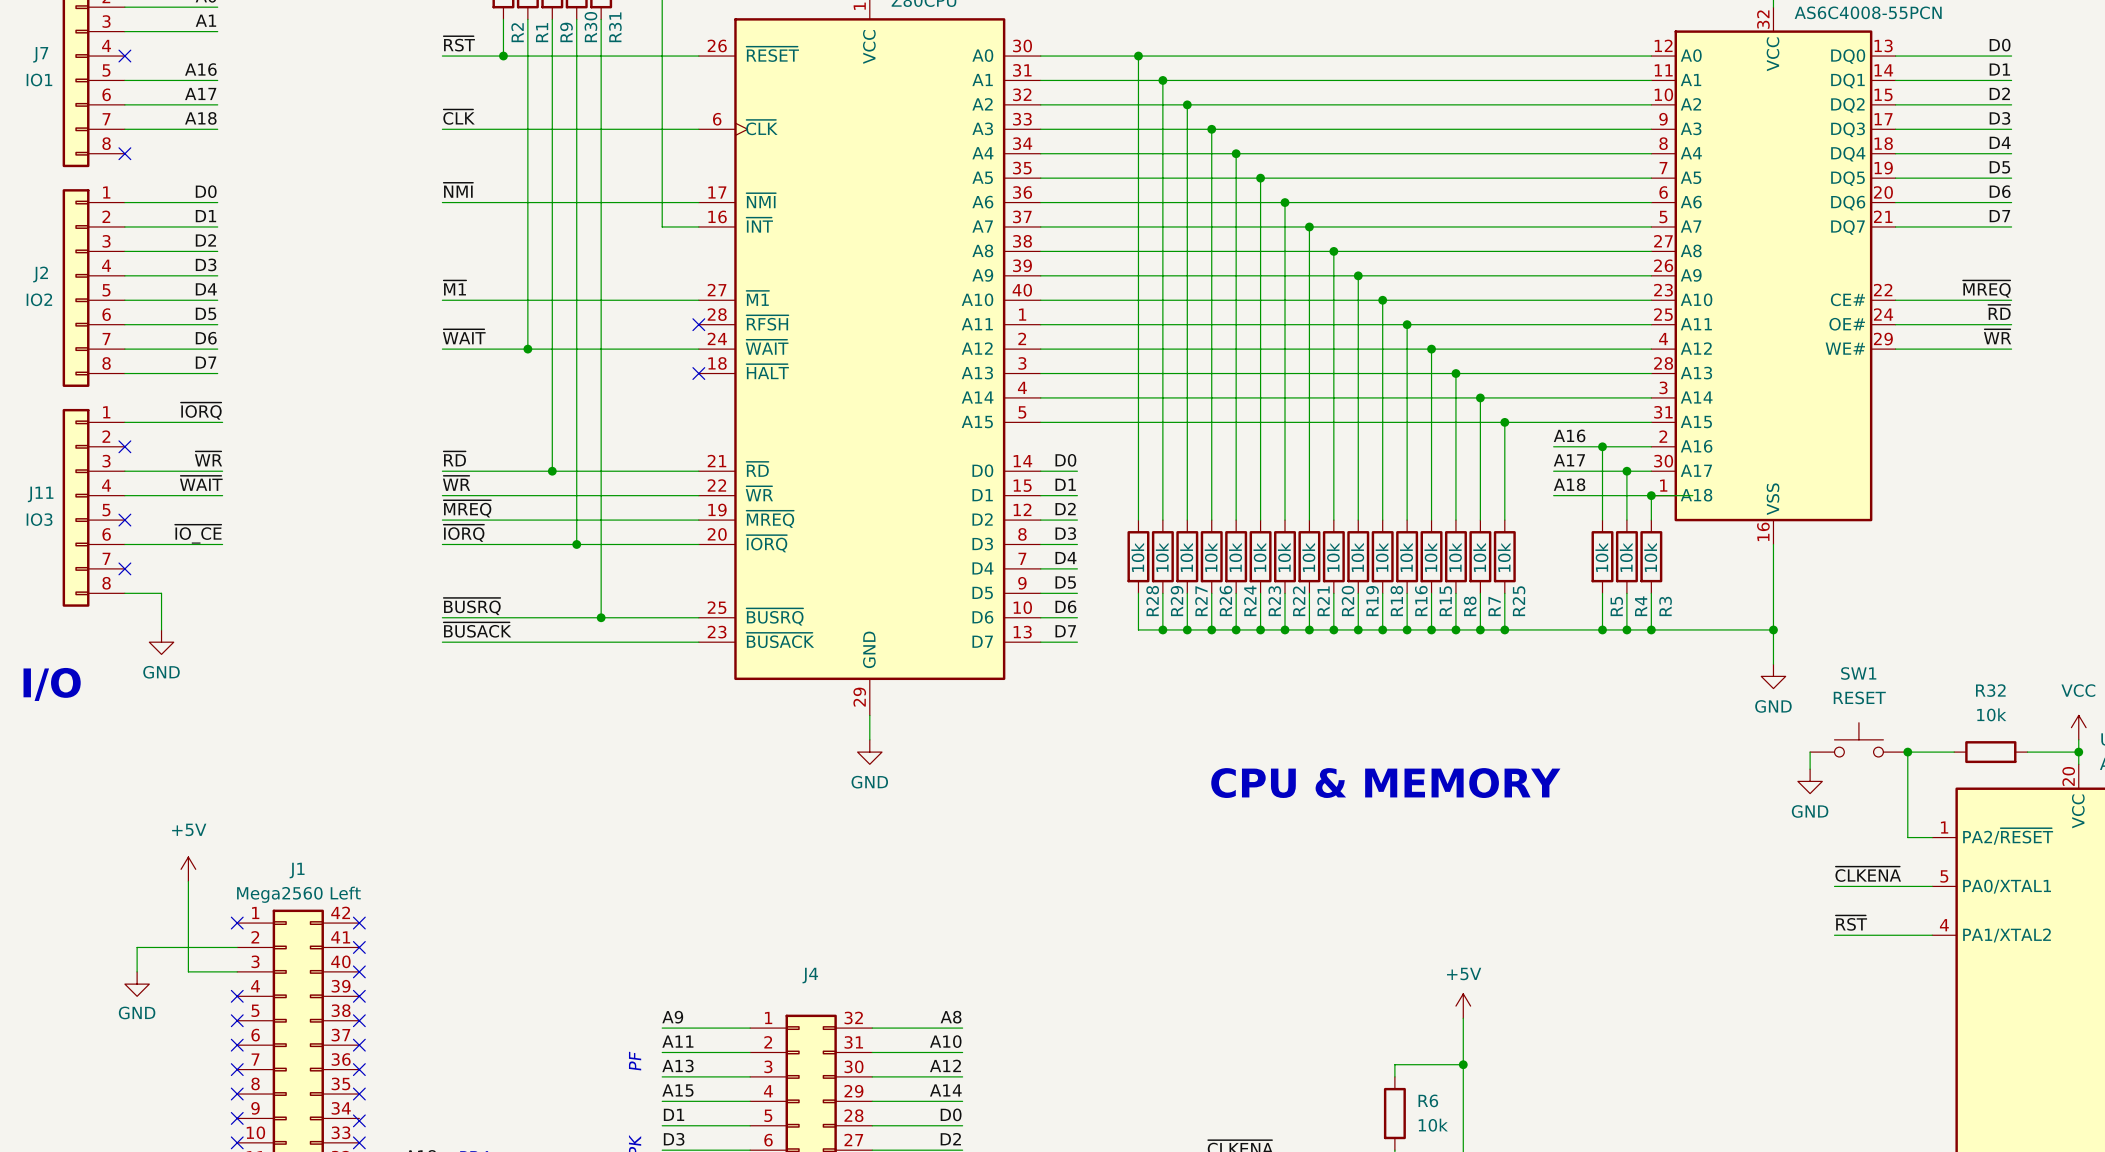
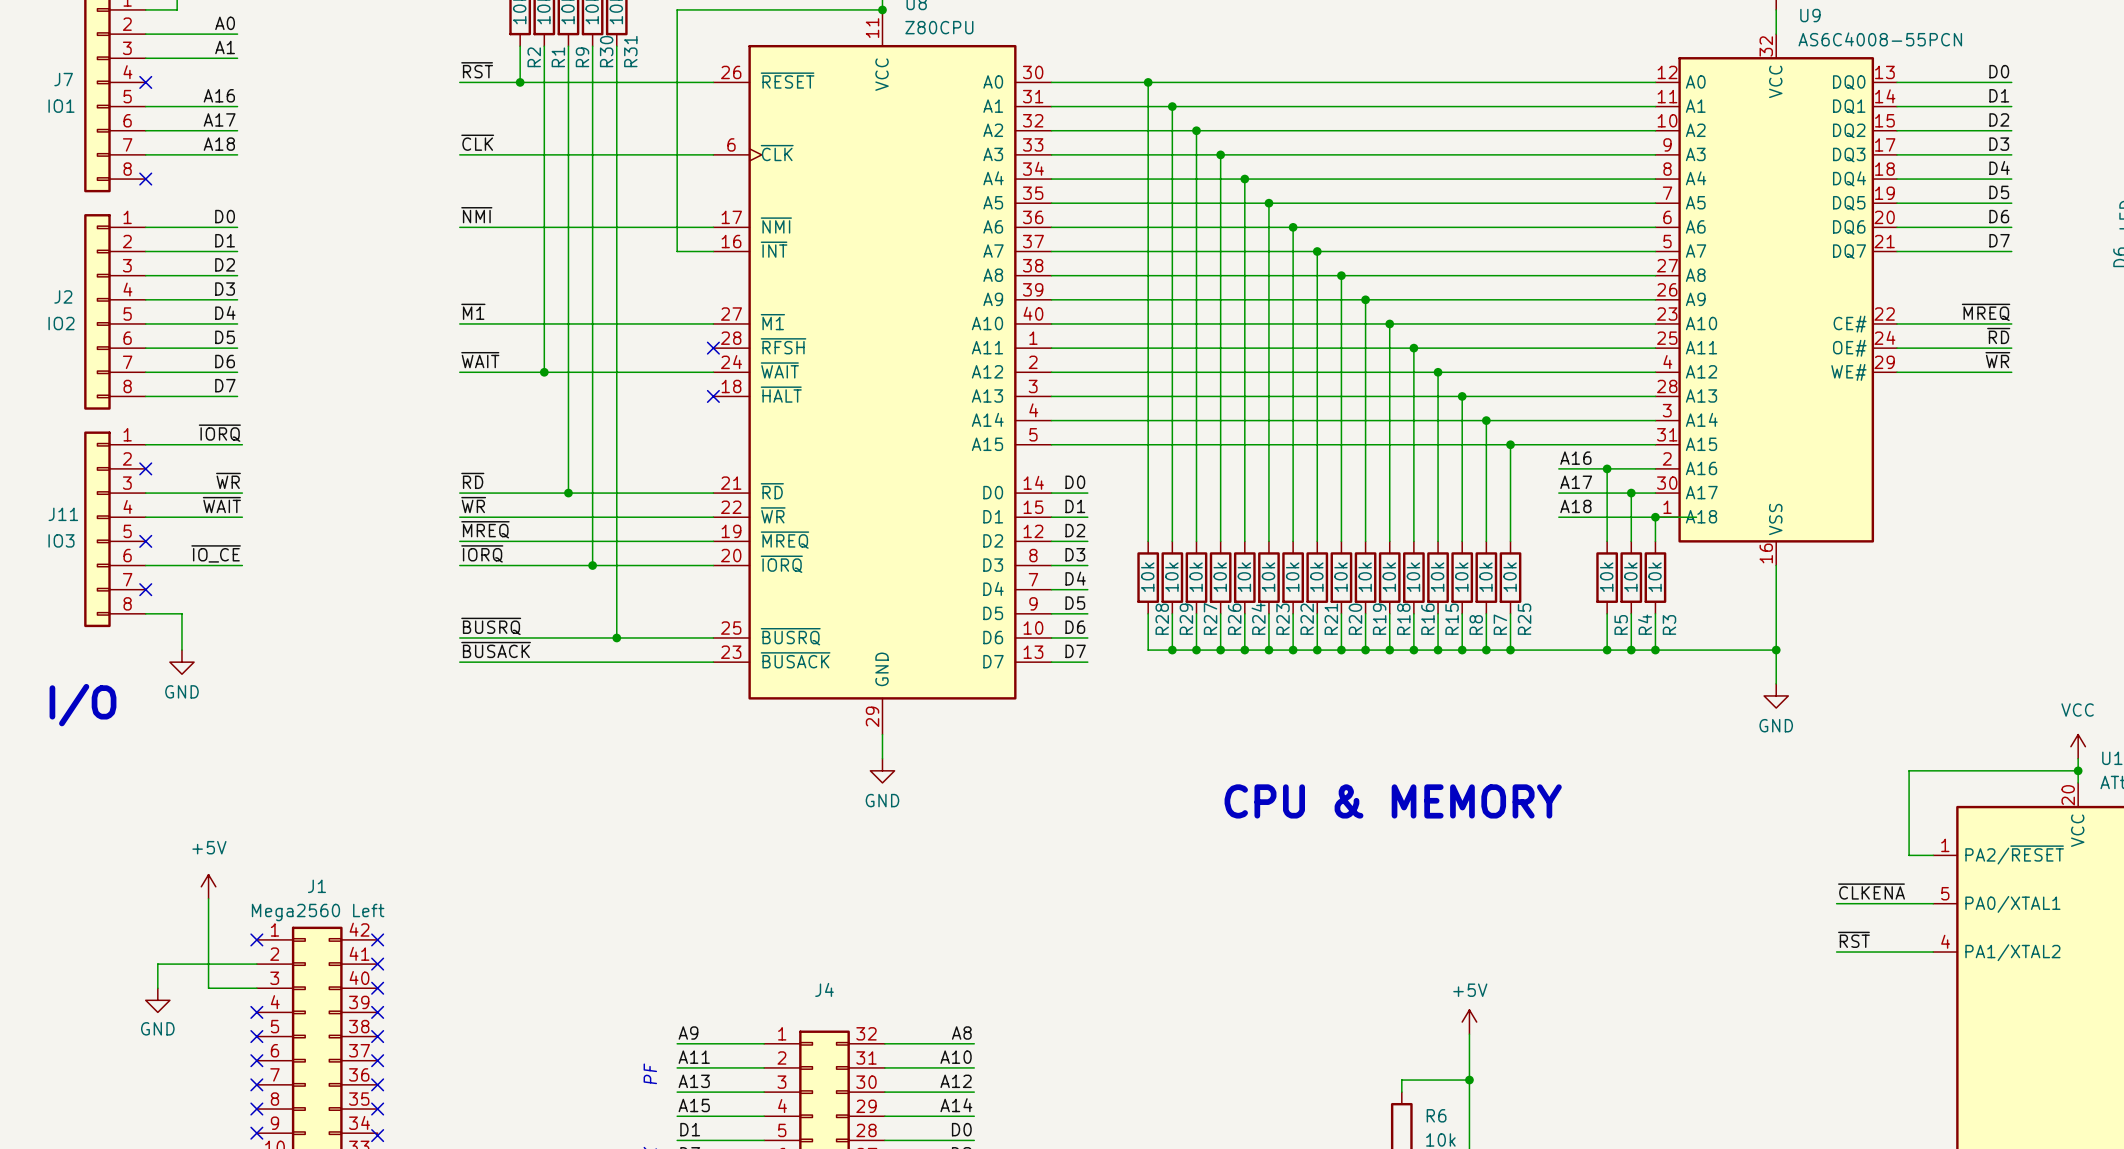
SW1: RESET (1858, 739) -> none
wire: (1810, 752) (1810, 769) -> none
junction: (1907, 752) -> none
wire: none -> (1954, 770) (2027, 770)
R32: 10k (1990, 752) -> none
power symbol: GND (1810, 781) -> none

